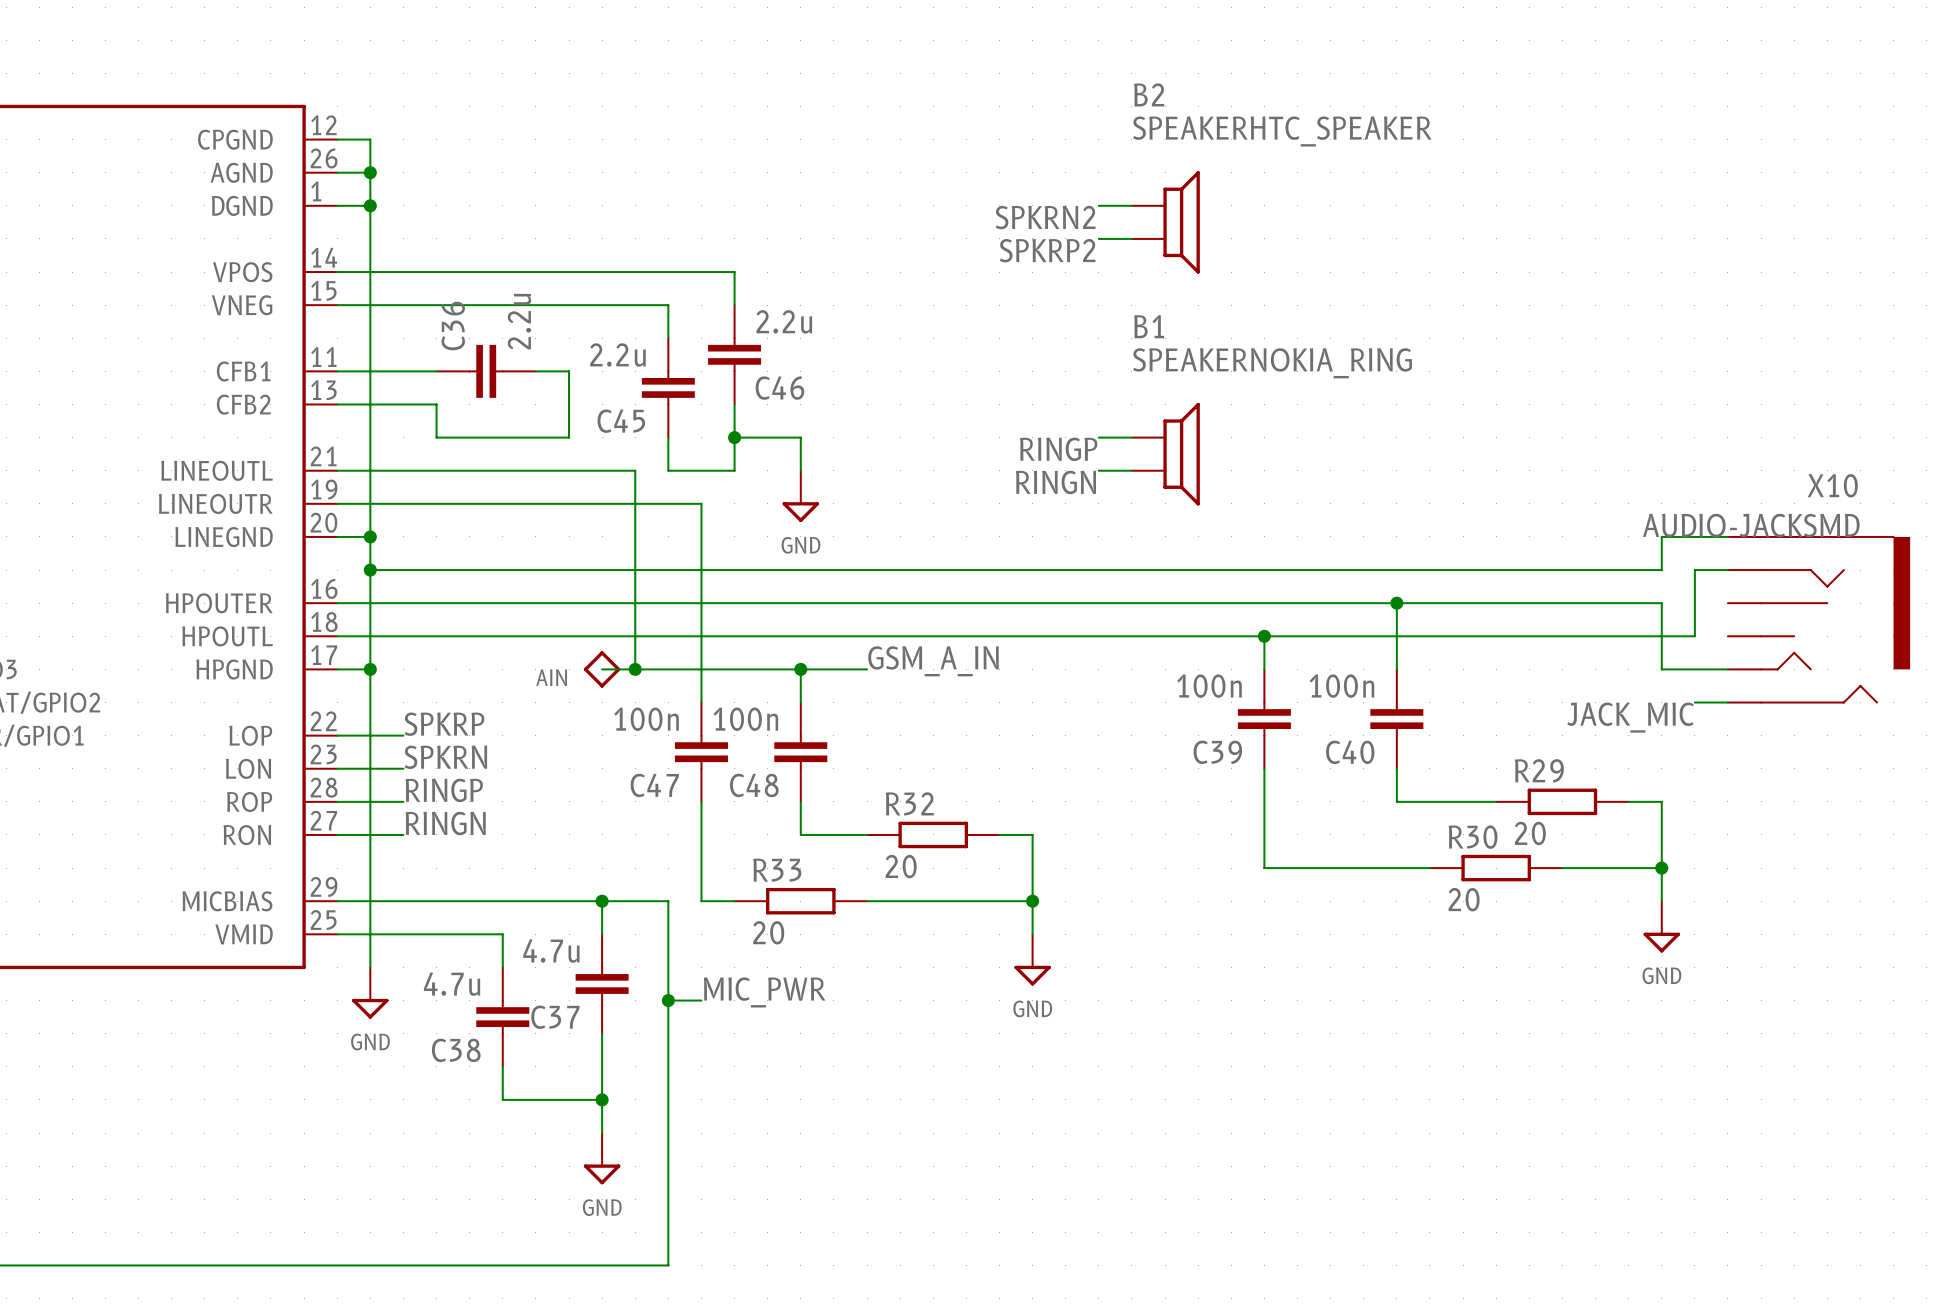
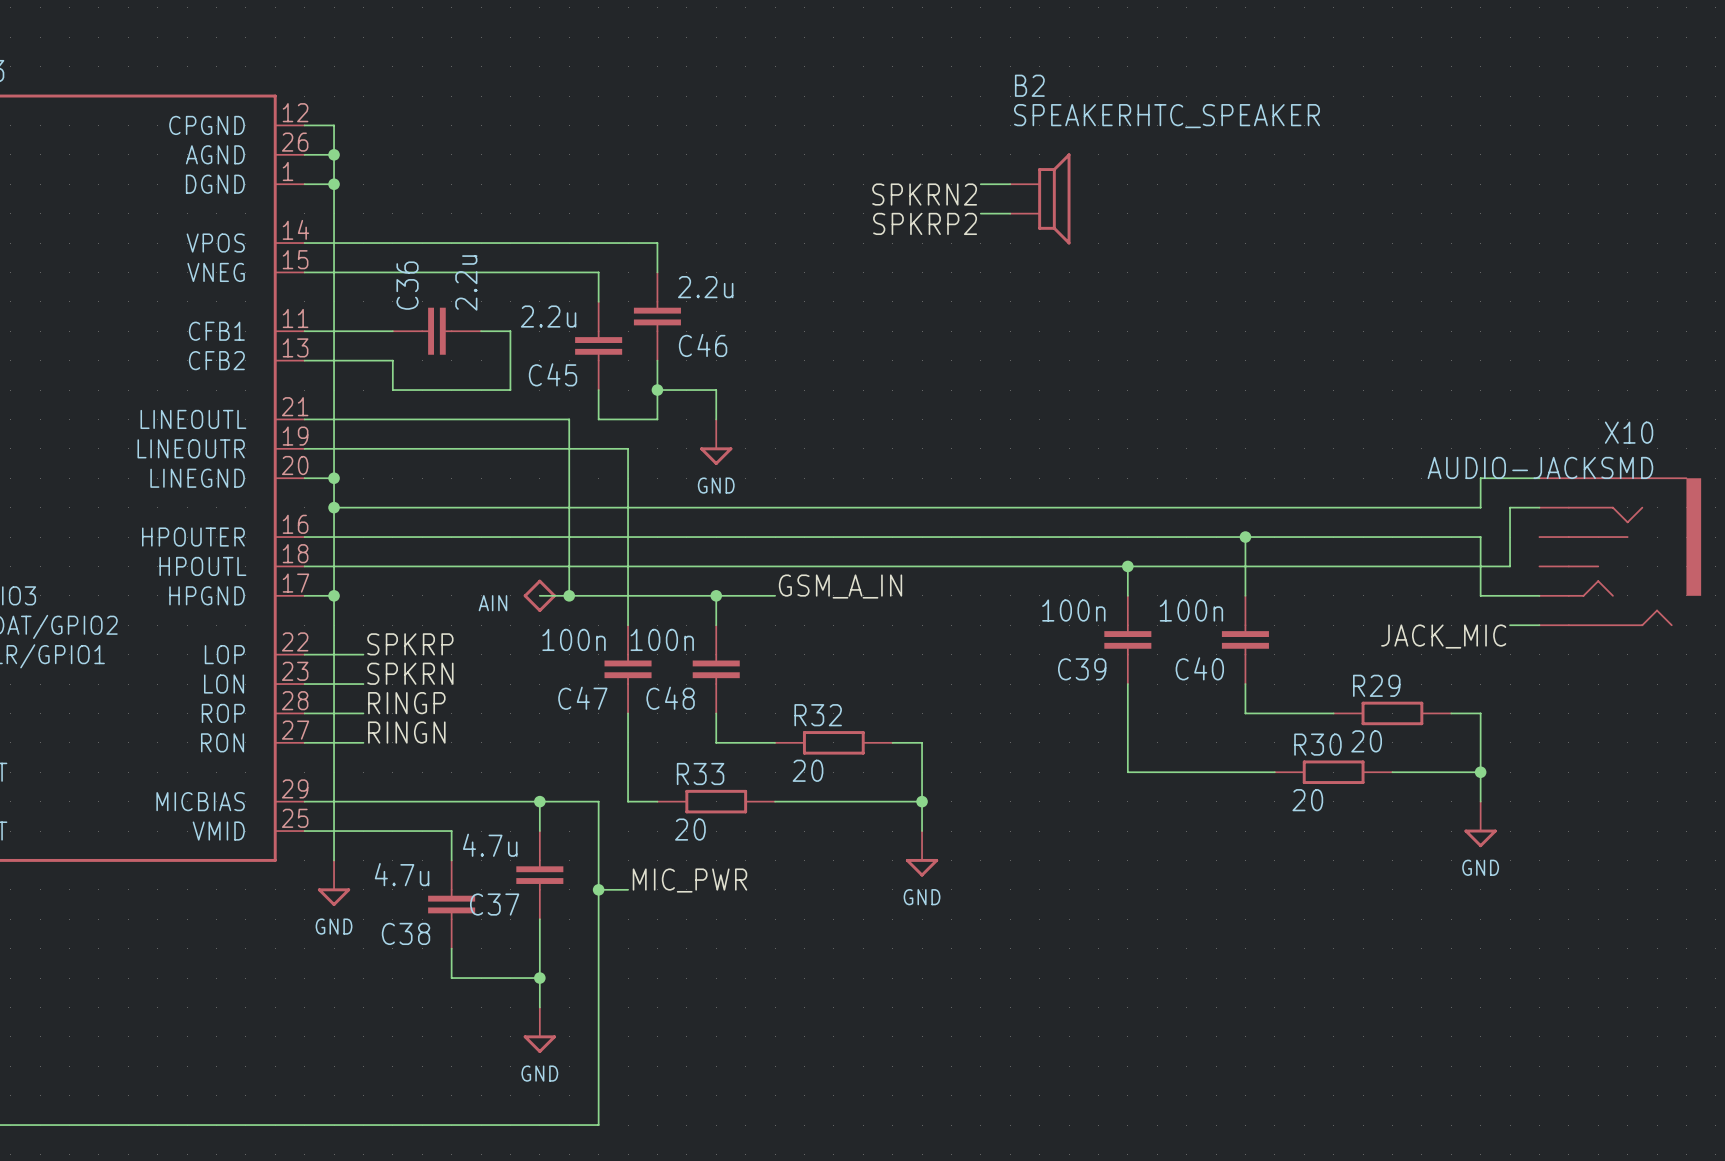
wire: (1098, 437) (1131, 437) -> none
label: RINGP (1058, 449) -> none
B1: SPEAKERNOKIA_RING (1165, 454) -> none
wire: (1098, 470) (1131, 470) -> none
label: RINGN (1055, 482) -> none

